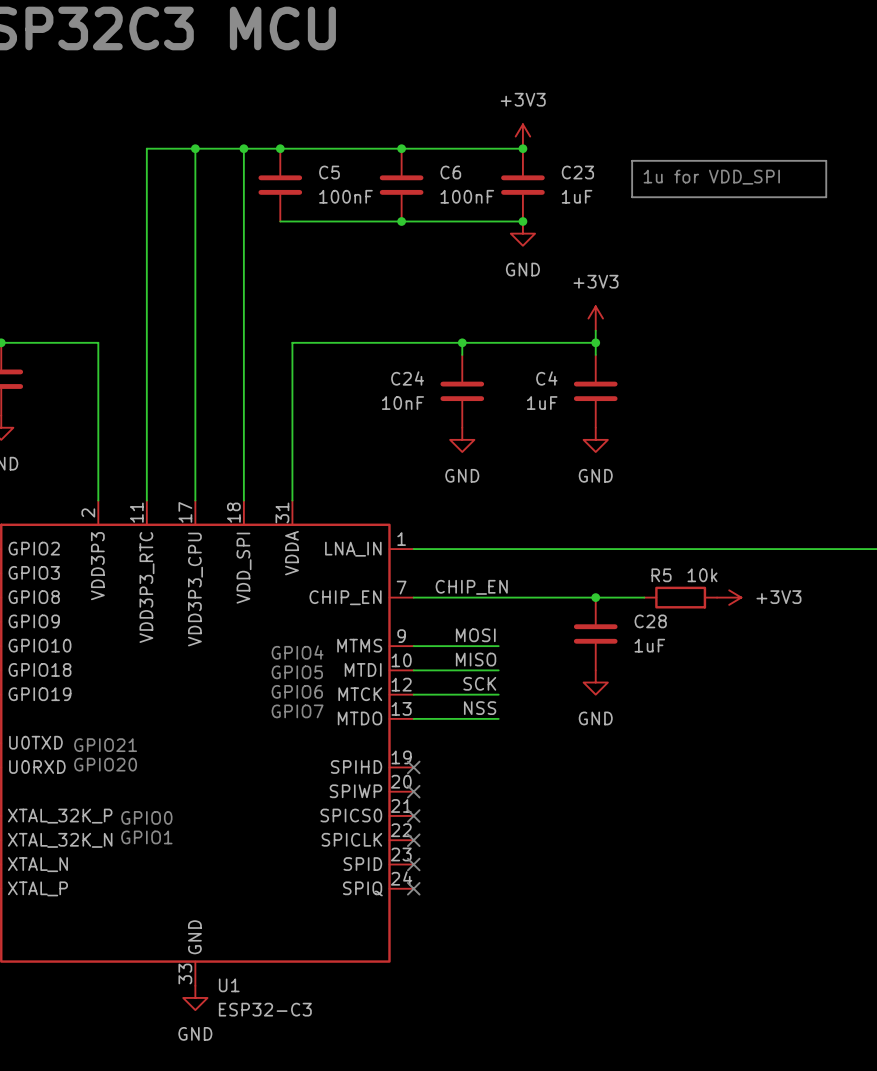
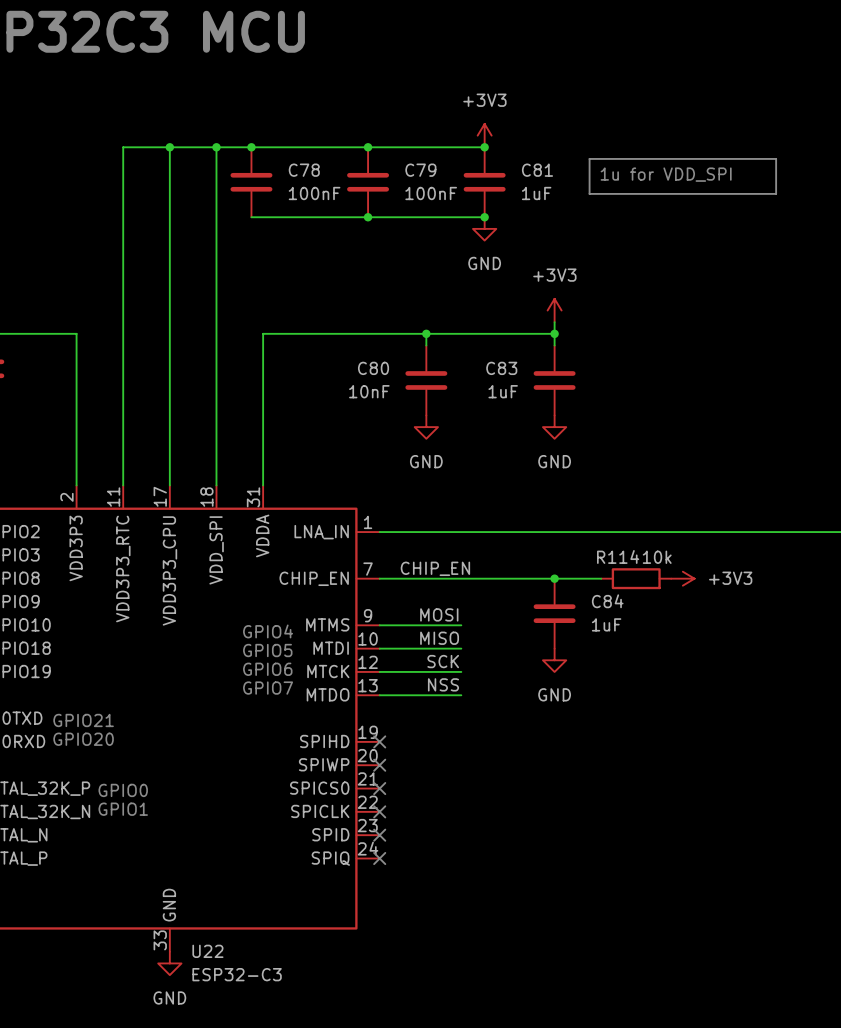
C5 name: C5 (329, 172) -> C78 (304, 170)
C6 name: C6 (450, 172) -> C79 (420, 170)
C23 name: C23 (577, 172) -> C81 (537, 170)
C24 name: C24 (407, 378) -> C80 (373, 368)
C4 name: C4 (546, 378) -> C83 (501, 368)
R5 name: R5 (661, 575) -> R114 (618, 556)
C28 name: C28 (650, 621) -> C84 (607, 601)
U1 name: U1 (229, 985) -> U22 (207, 951)

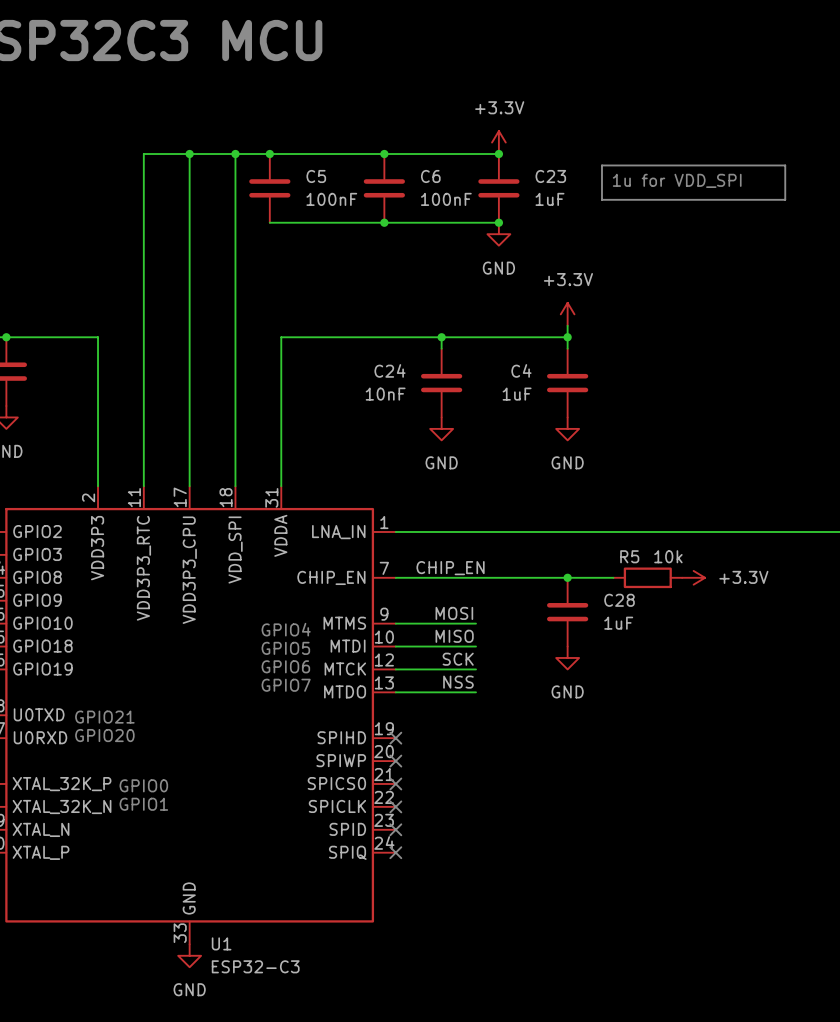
power symbol: +3V3 (484, 135) -> +3.3V (498, 142)
C78 name: C78 (304, 170) -> C5 (316, 176)
C79 name: C79 (420, 170) -> C6 (430, 176)
C81 name: C81 (537, 170) -> C23 (550, 176)
power symbol: +3V3 (554, 310) -> +3.3V (567, 314)
C80 name: C80 (373, 368) -> C24 (390, 370)
C83 name: C83 (501, 368) -> C4 (521, 370)
R114 name: R114 (618, 556) -> R5 (629, 556)
power symbol: +3V3 (682, 578) -> +3.3V (693, 577)
C84 name: C84 (607, 601) -> C28 (619, 600)
U22 name: U22 (207, 951) -> U1 (221, 943)

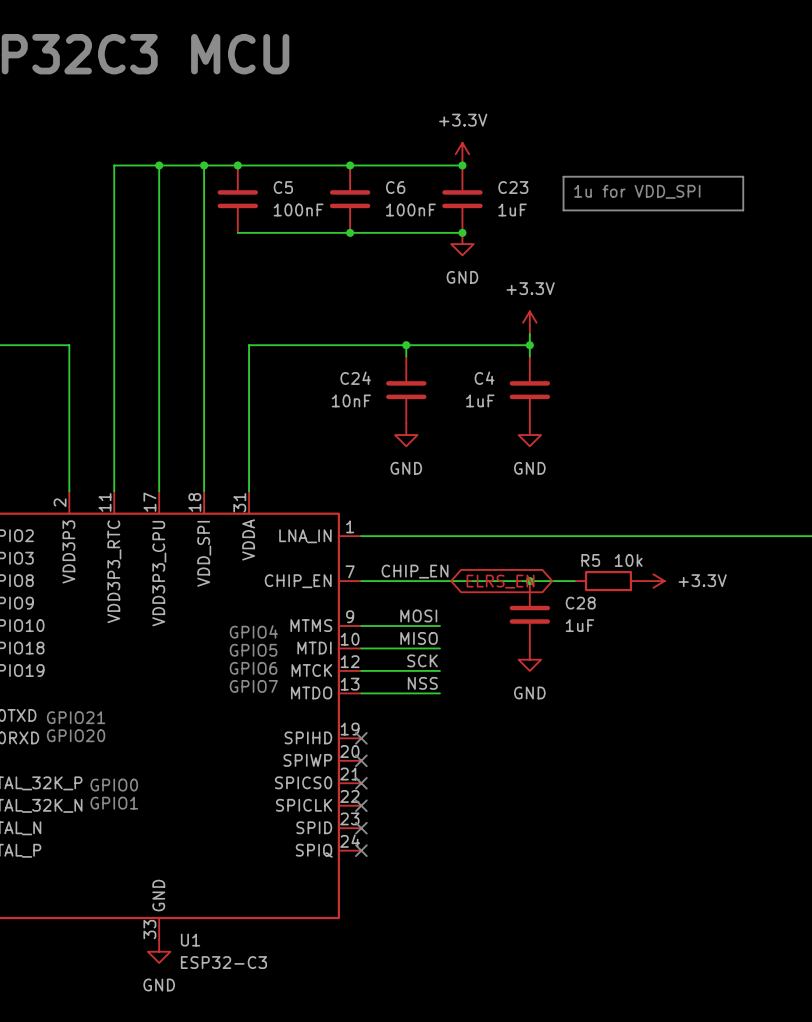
global label: none -> ELRS_EN (500, 581)

